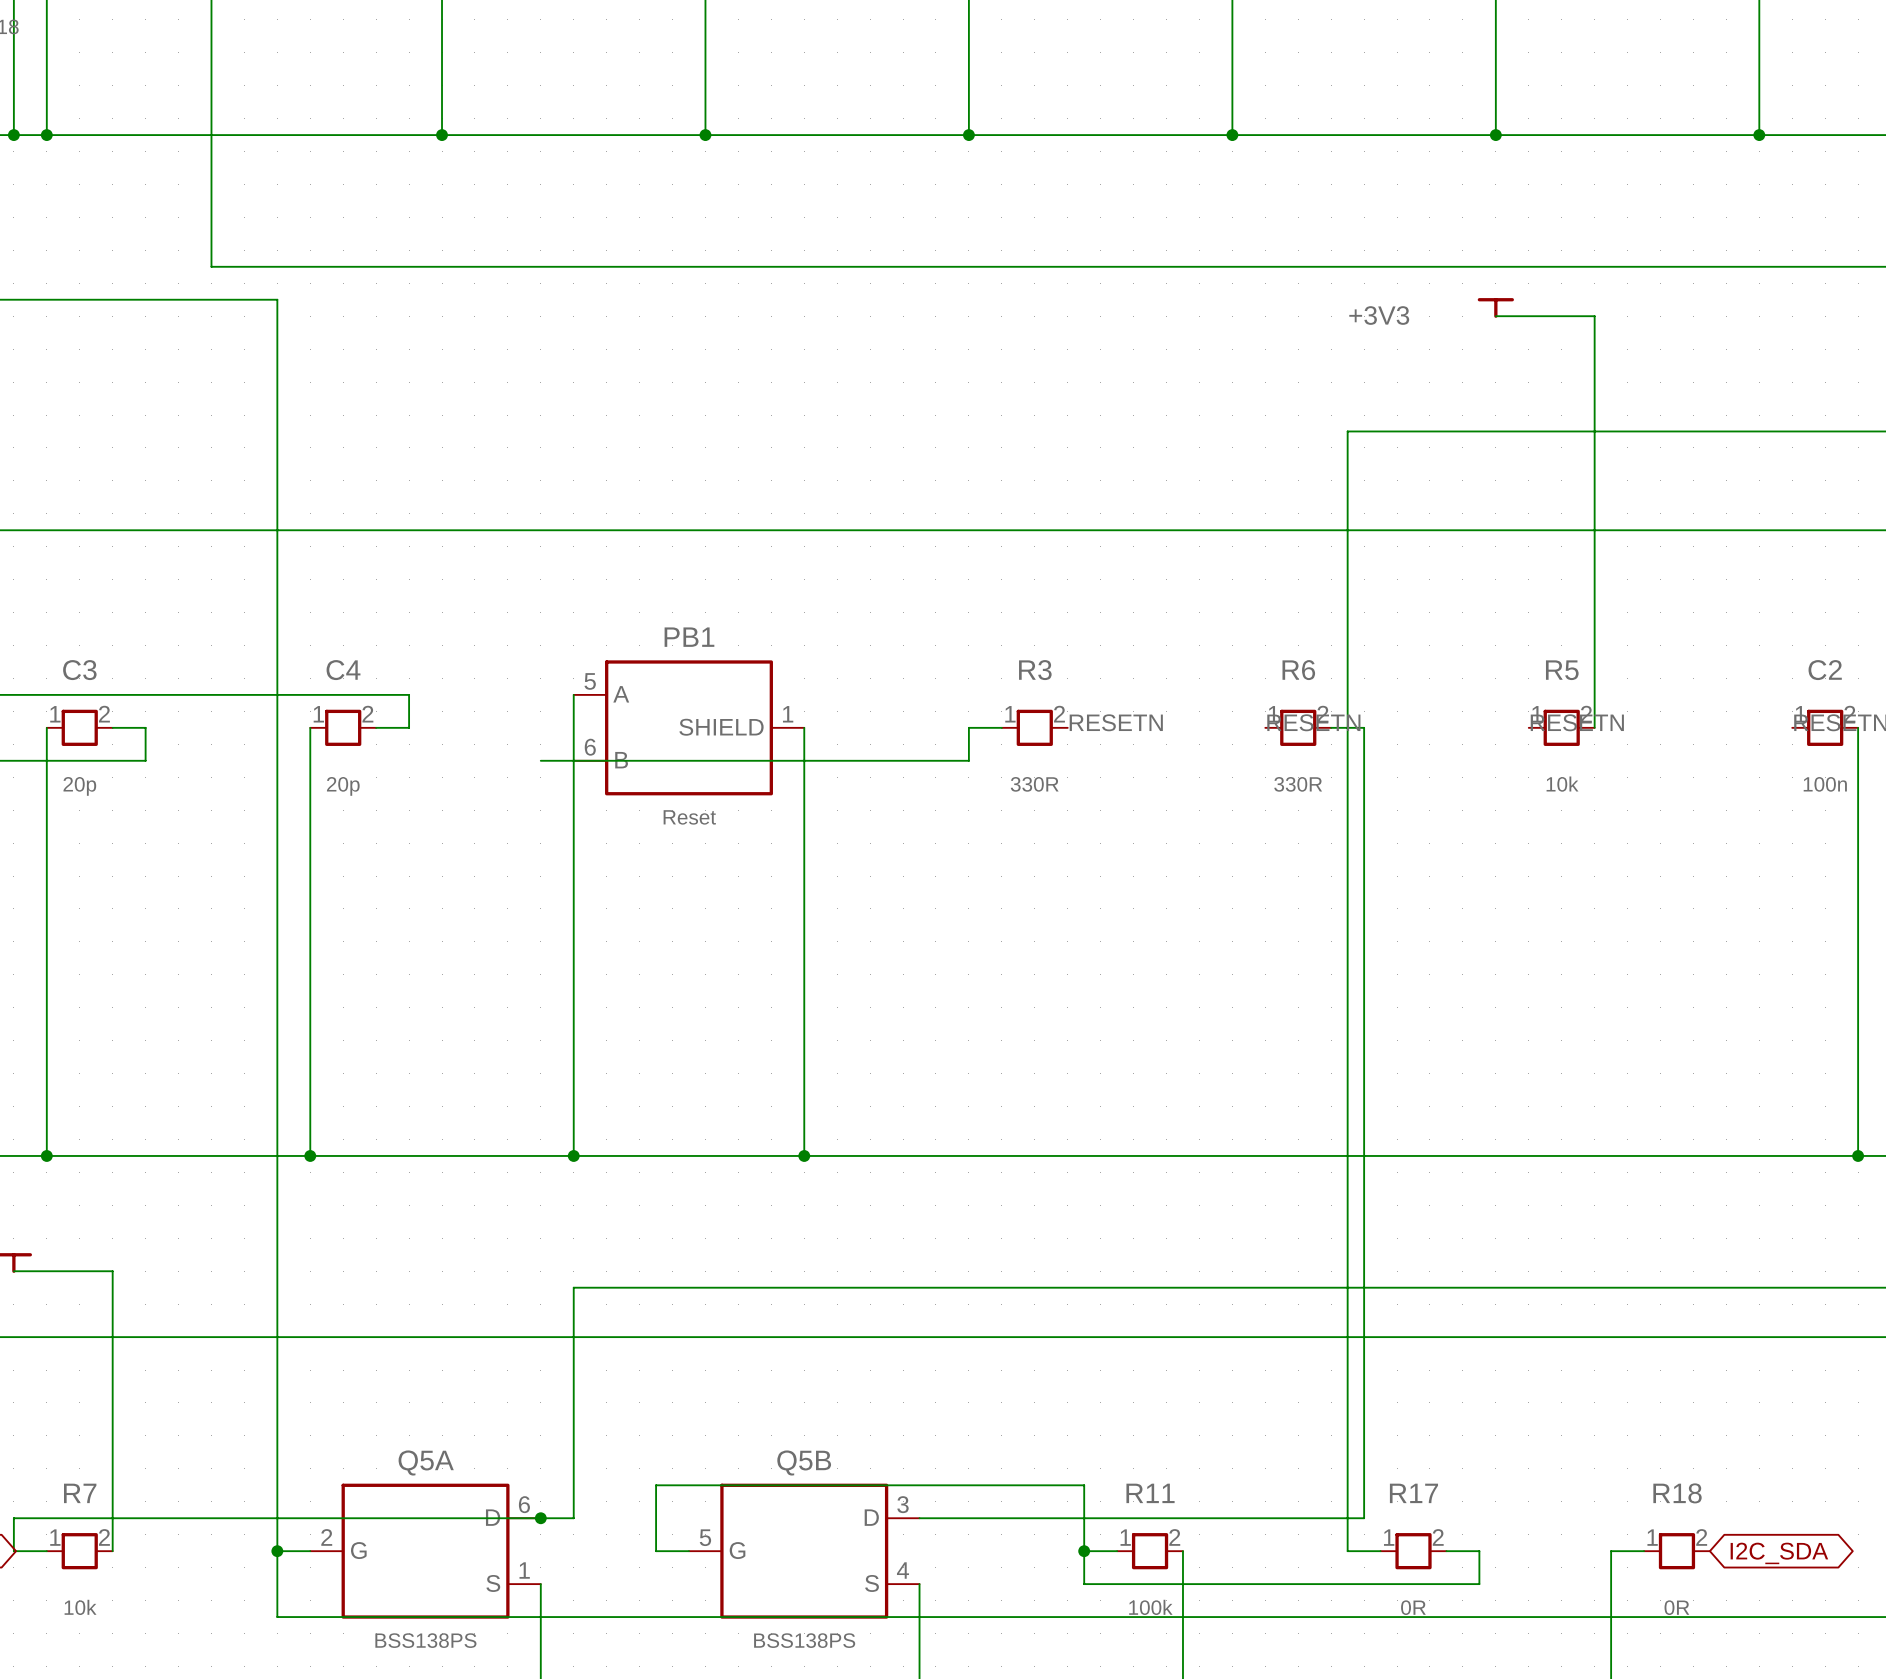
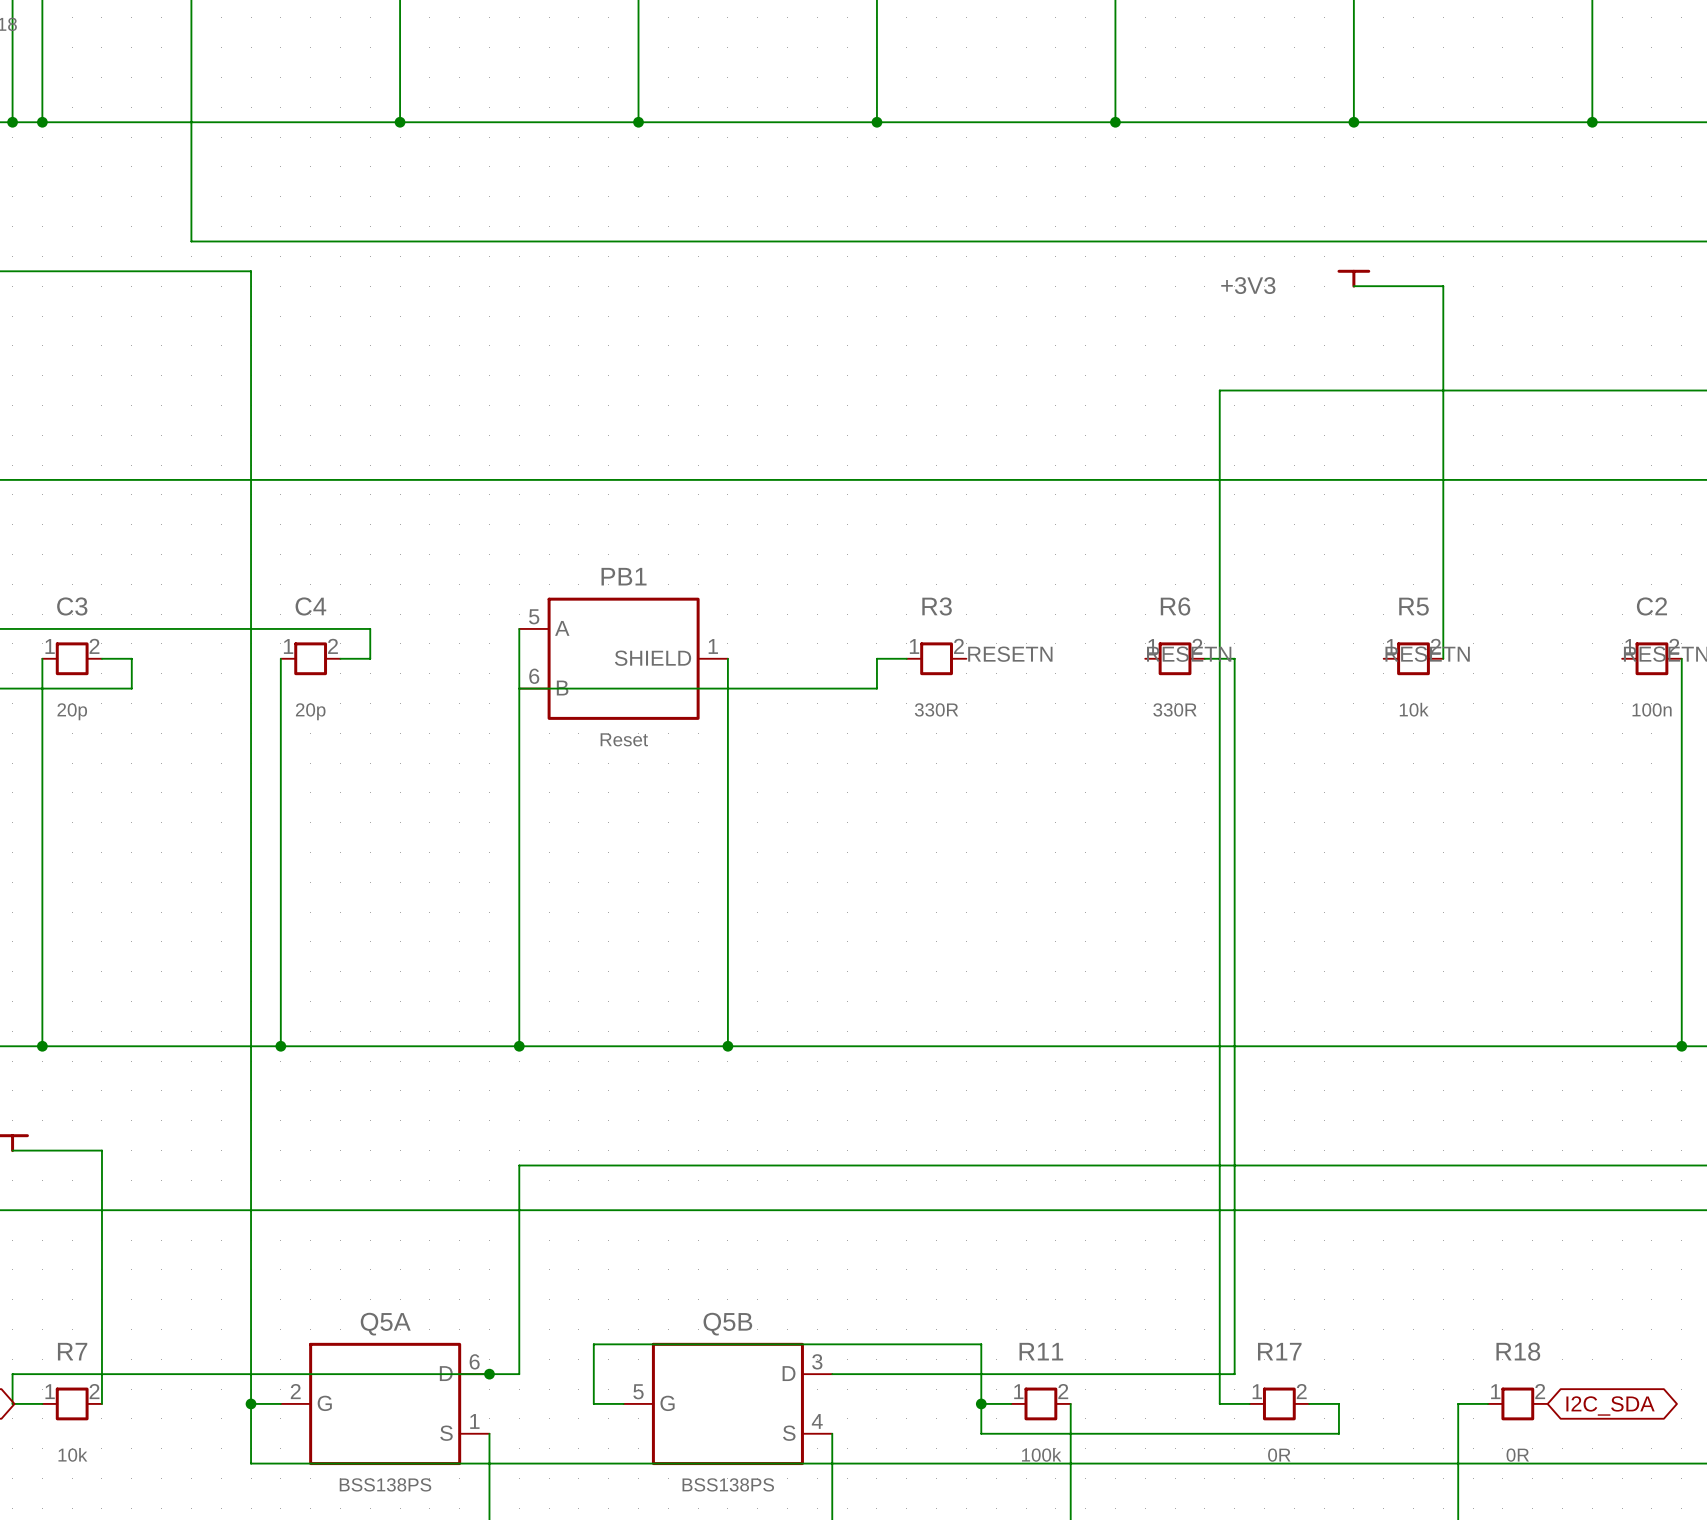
wire: (540, 760) (573, 760) -> none

